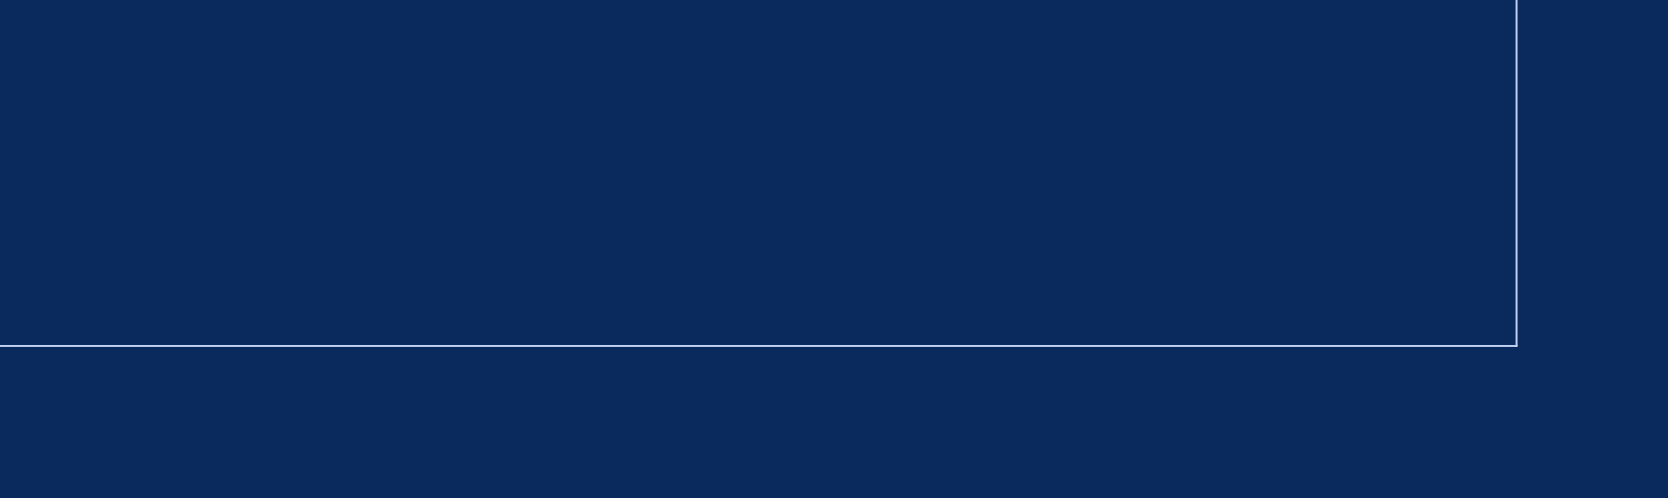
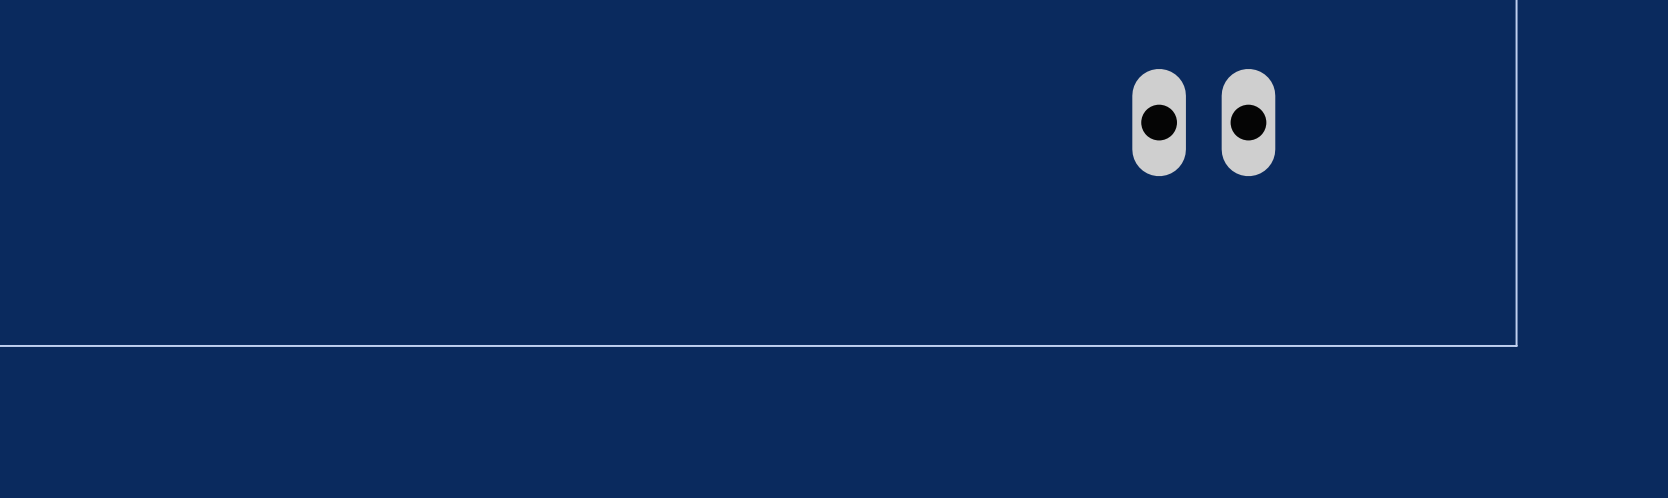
part: none -> (1203, 122)

